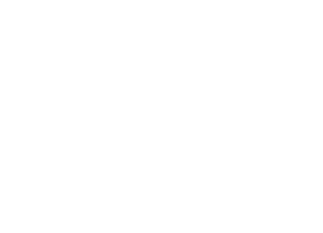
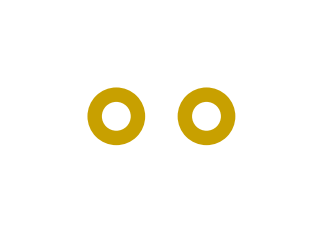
part: none -> (161, 116)

